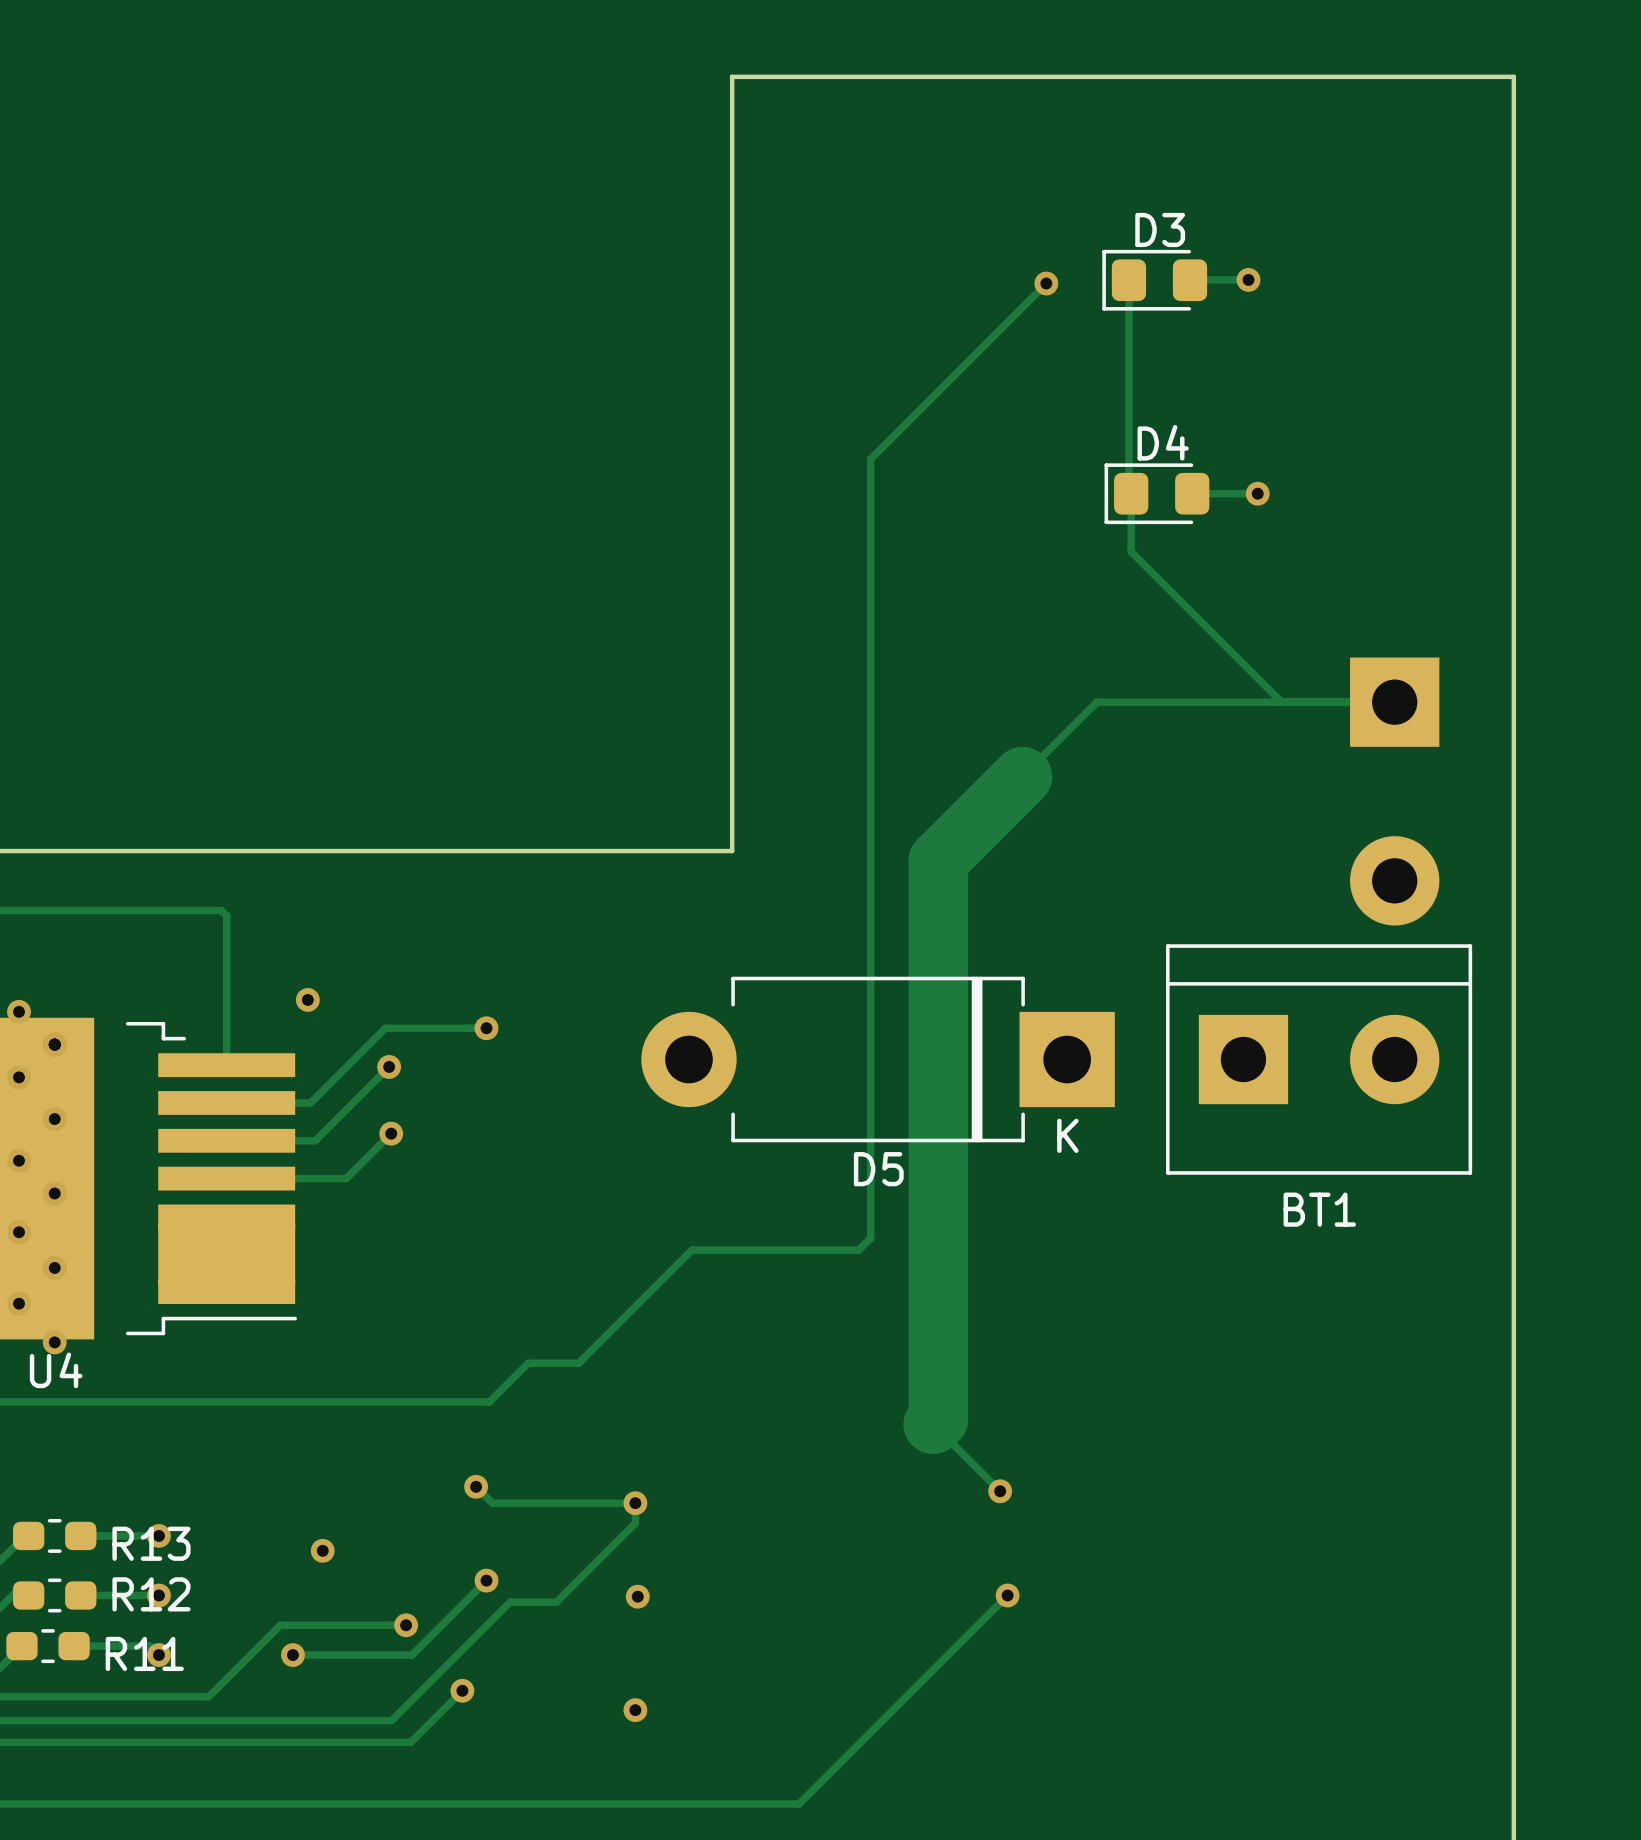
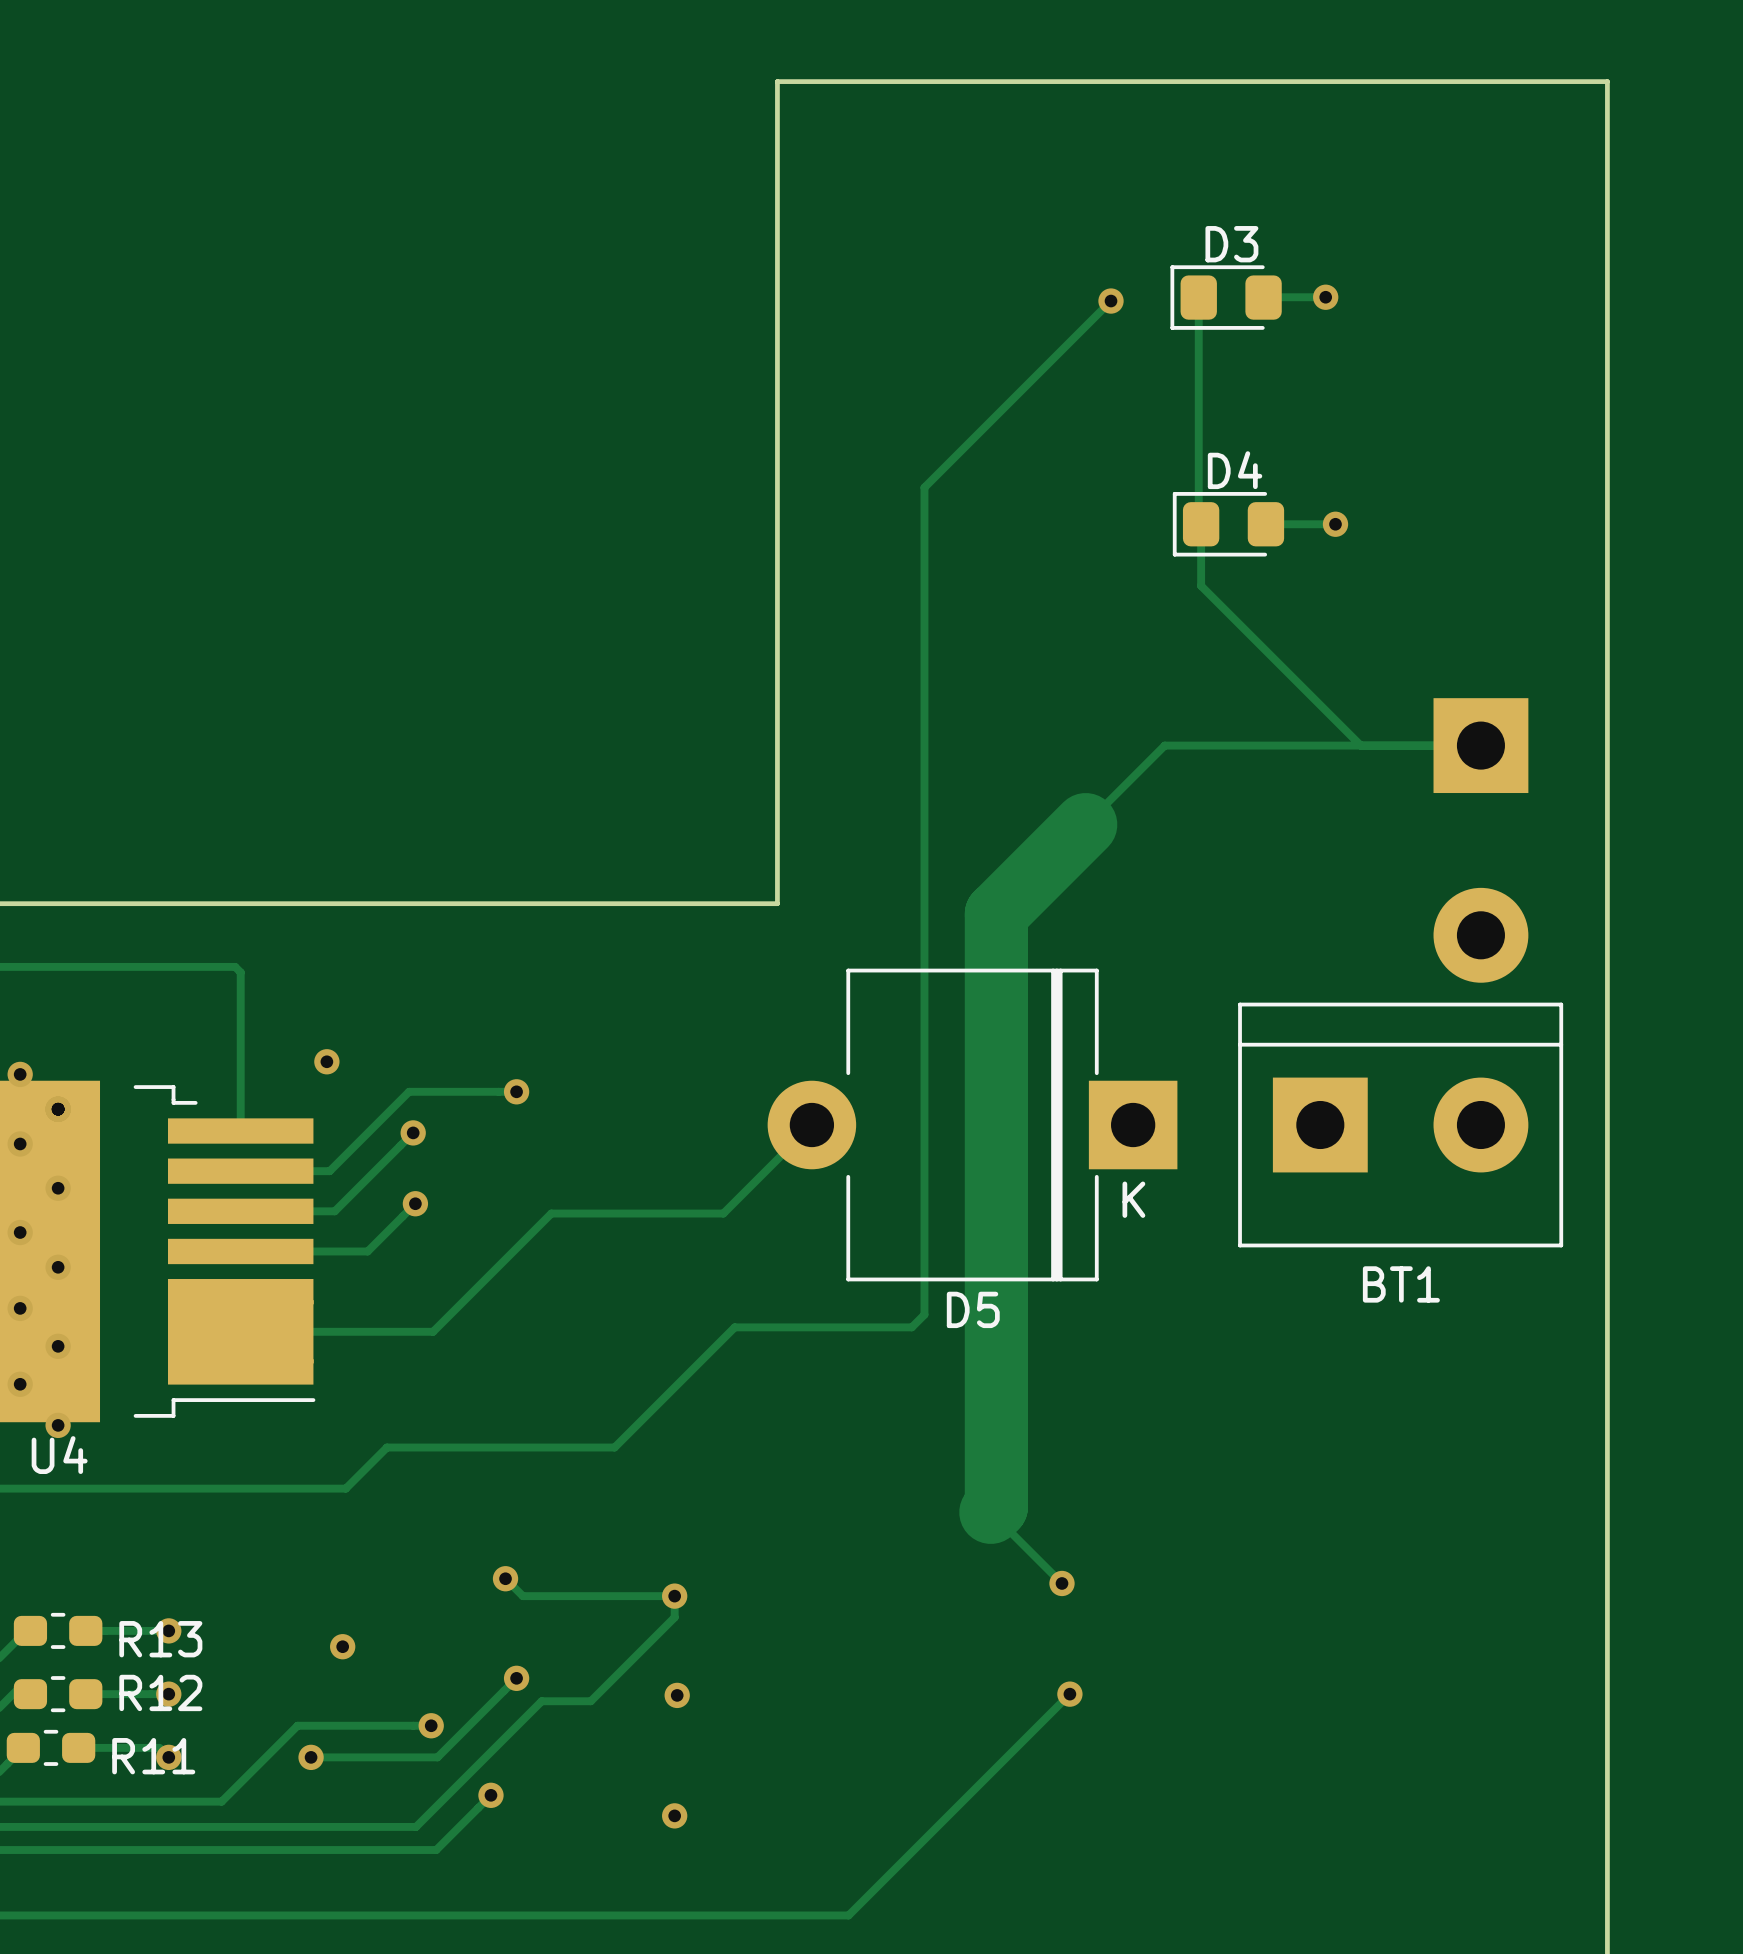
D5 footprint: [641, 976, 1115, 1143] -> [767, 968, 1178, 1282]
track: none -> (811, 1125) (723, 1213) (551, 1213) (433, 1331) (240, 1331)
D5 name position: D5 (878, 1169) -> D5 (973, 1309)
track: (528, 1363) (489, 1401) (325, 1401) -> (560, 1447) (386, 1447) (345, 1488)

